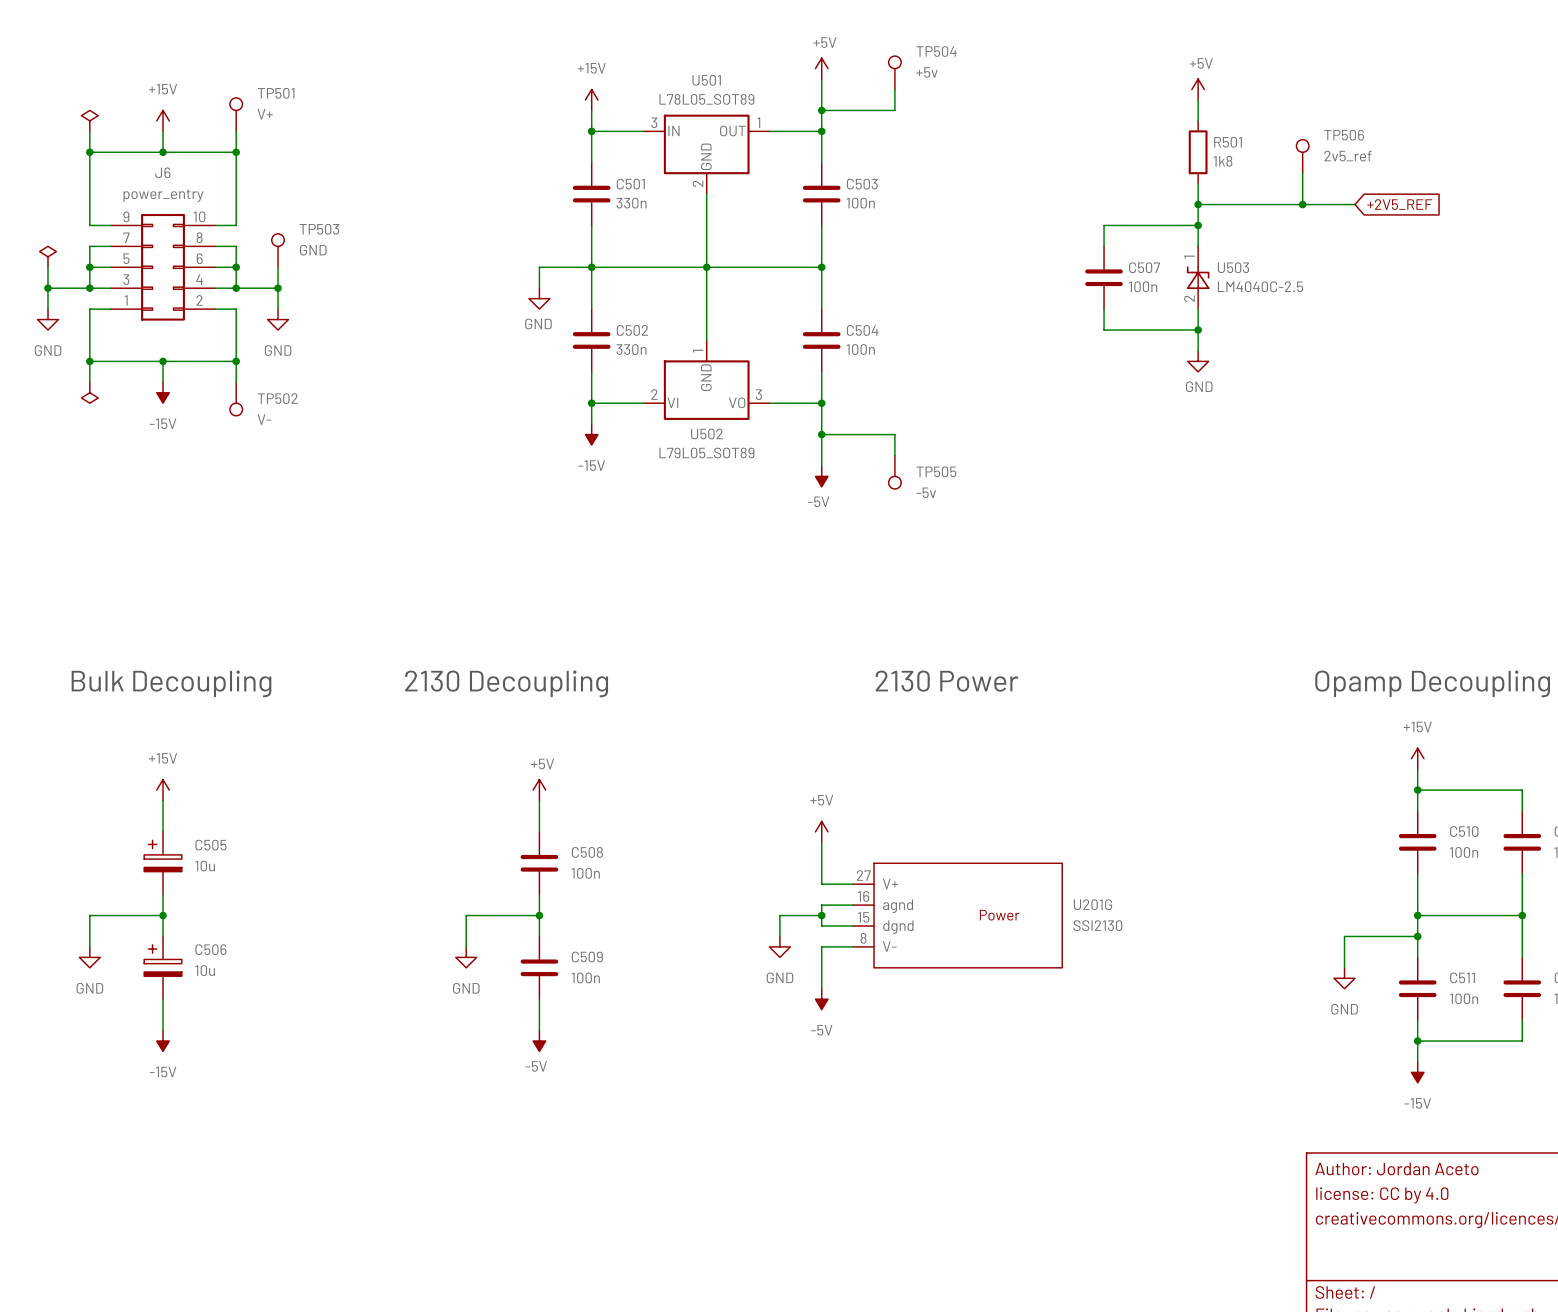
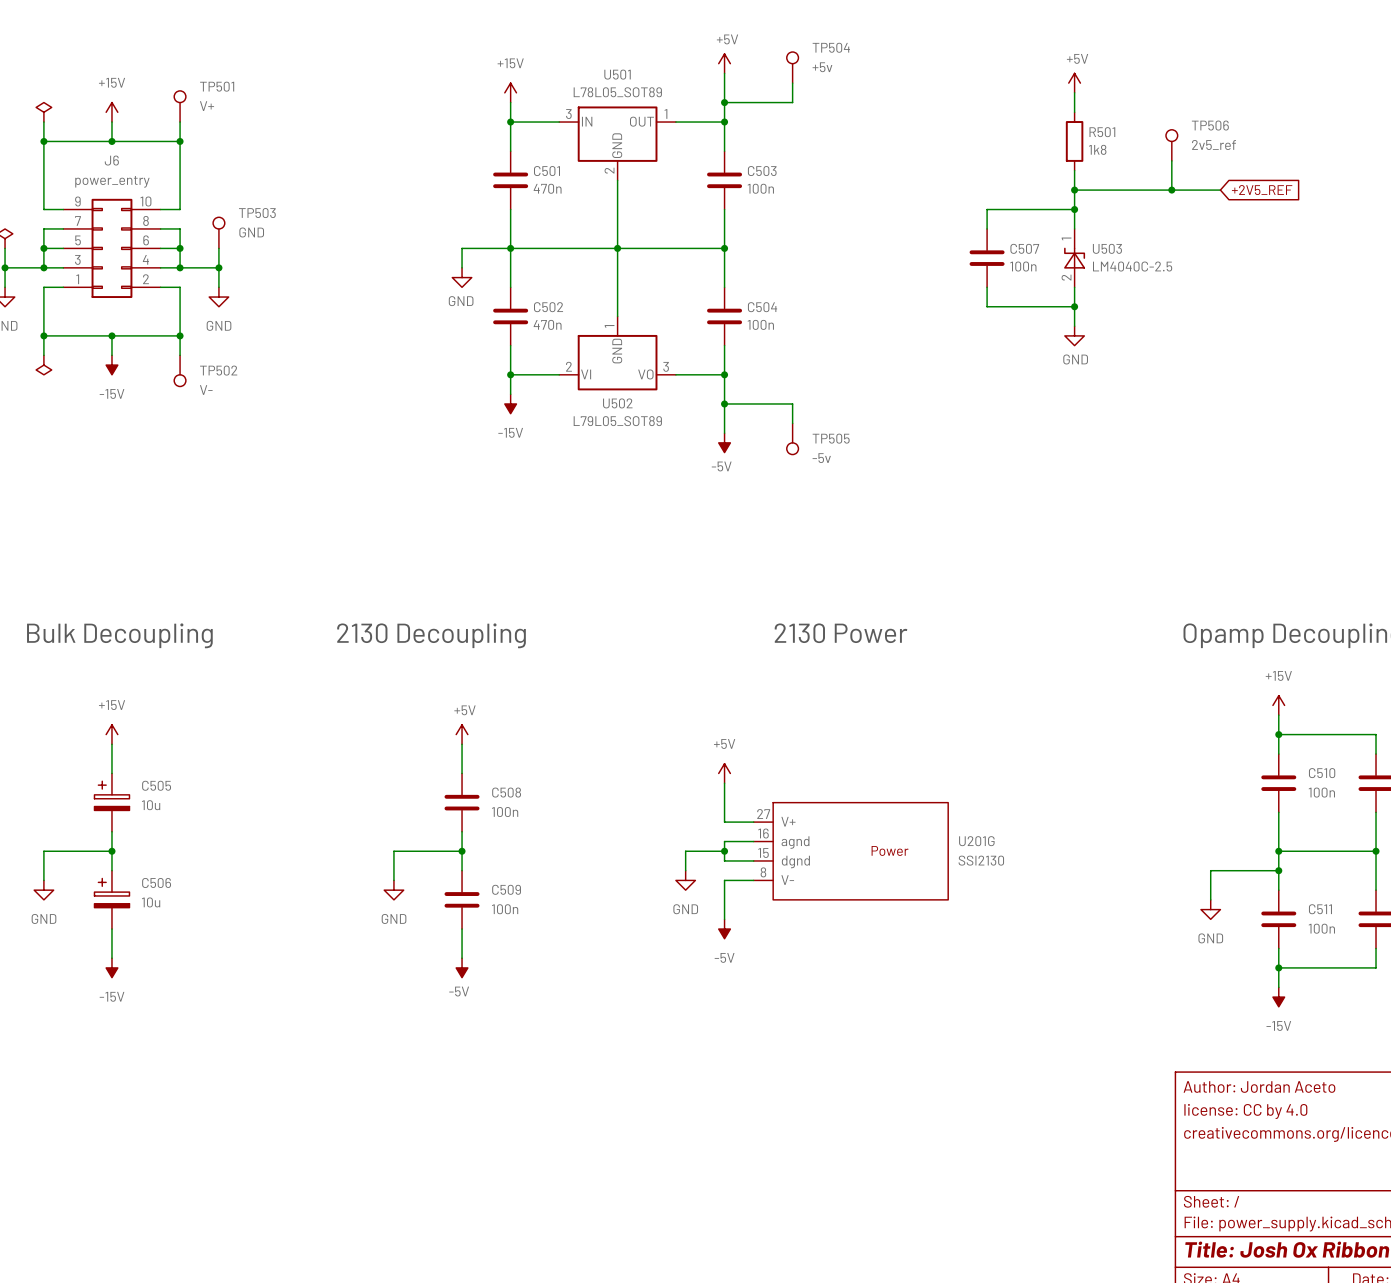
C501 value: 330n (631, 203) -> 470n (547, 188)
C502 value: 330n (631, 349) -> 470n (547, 324)

